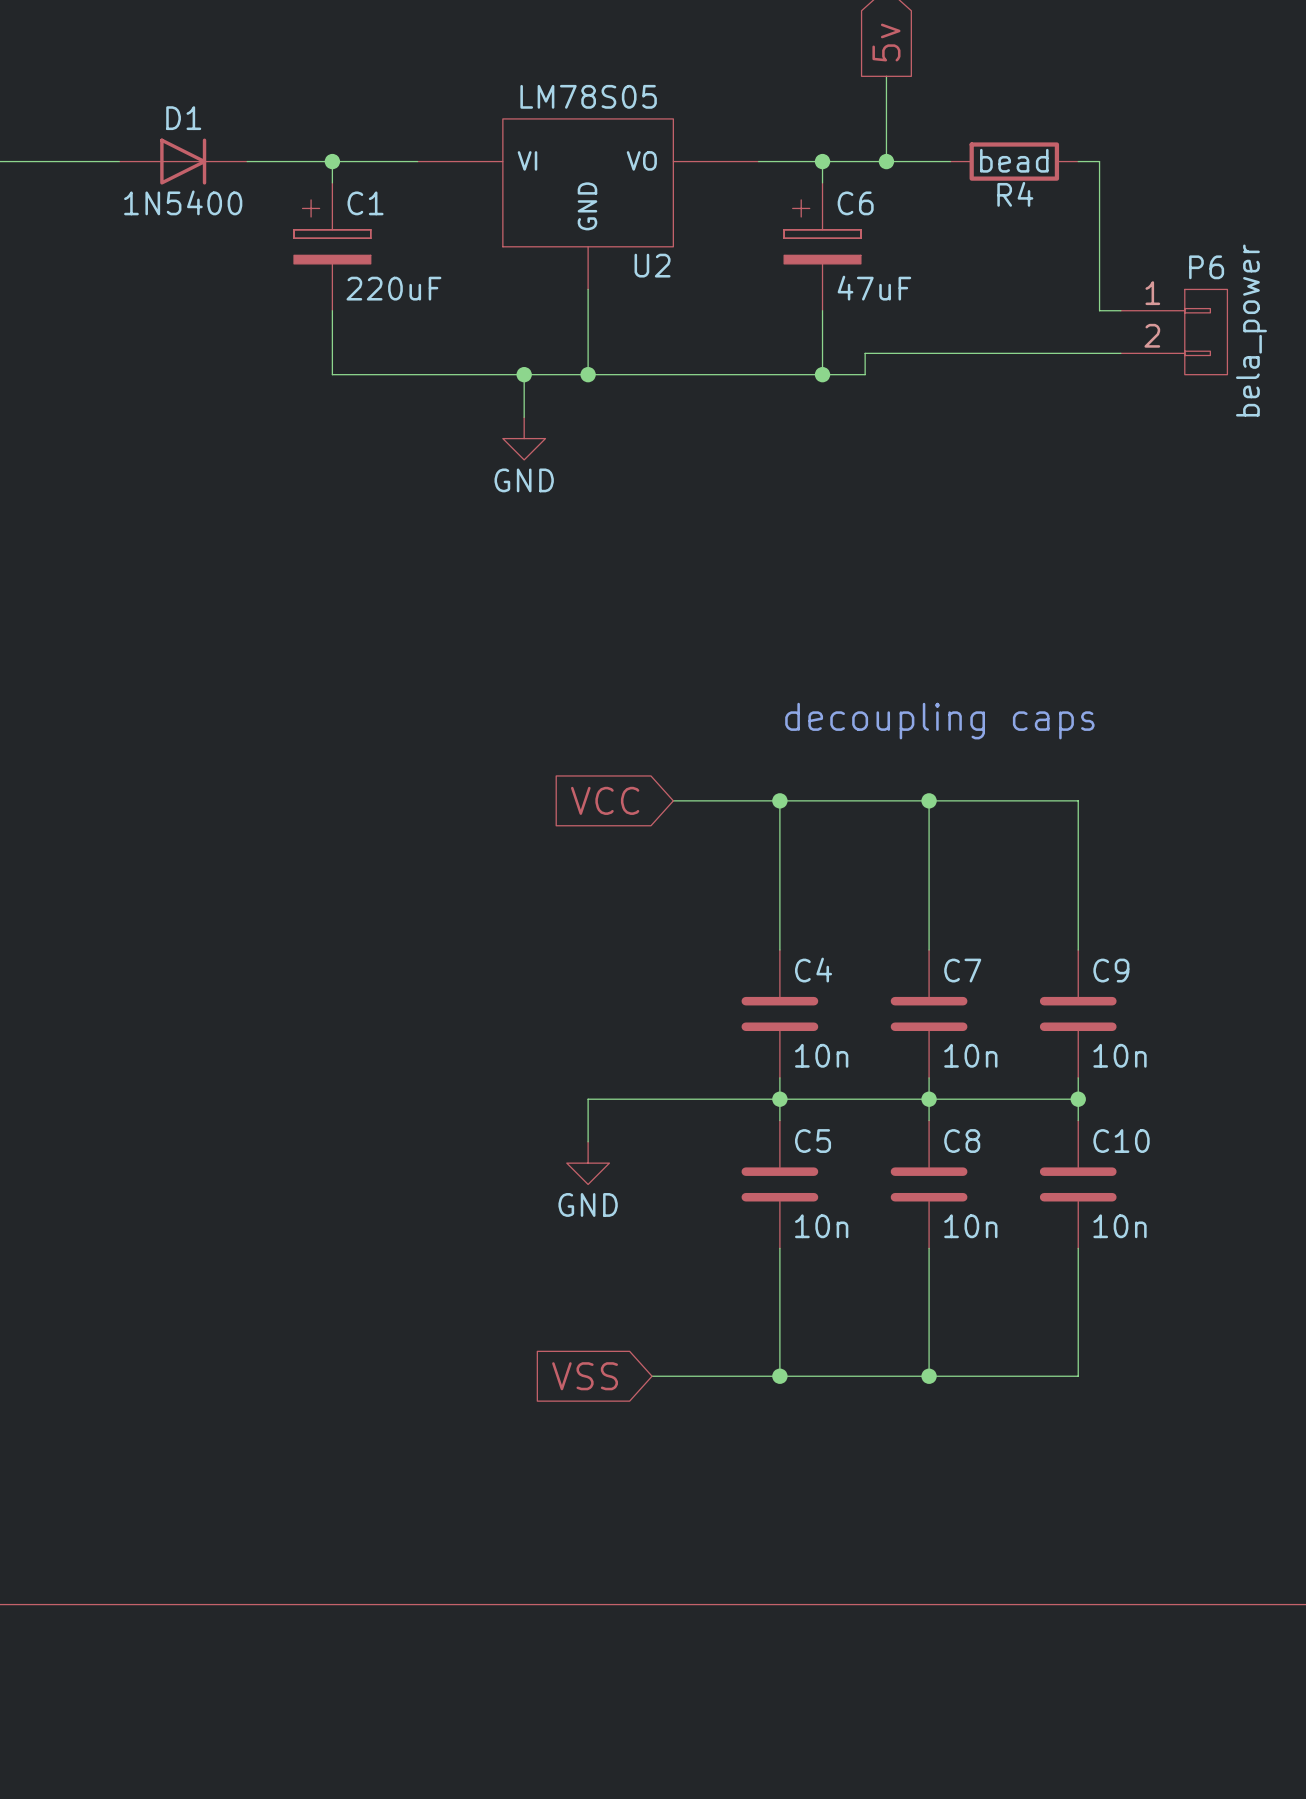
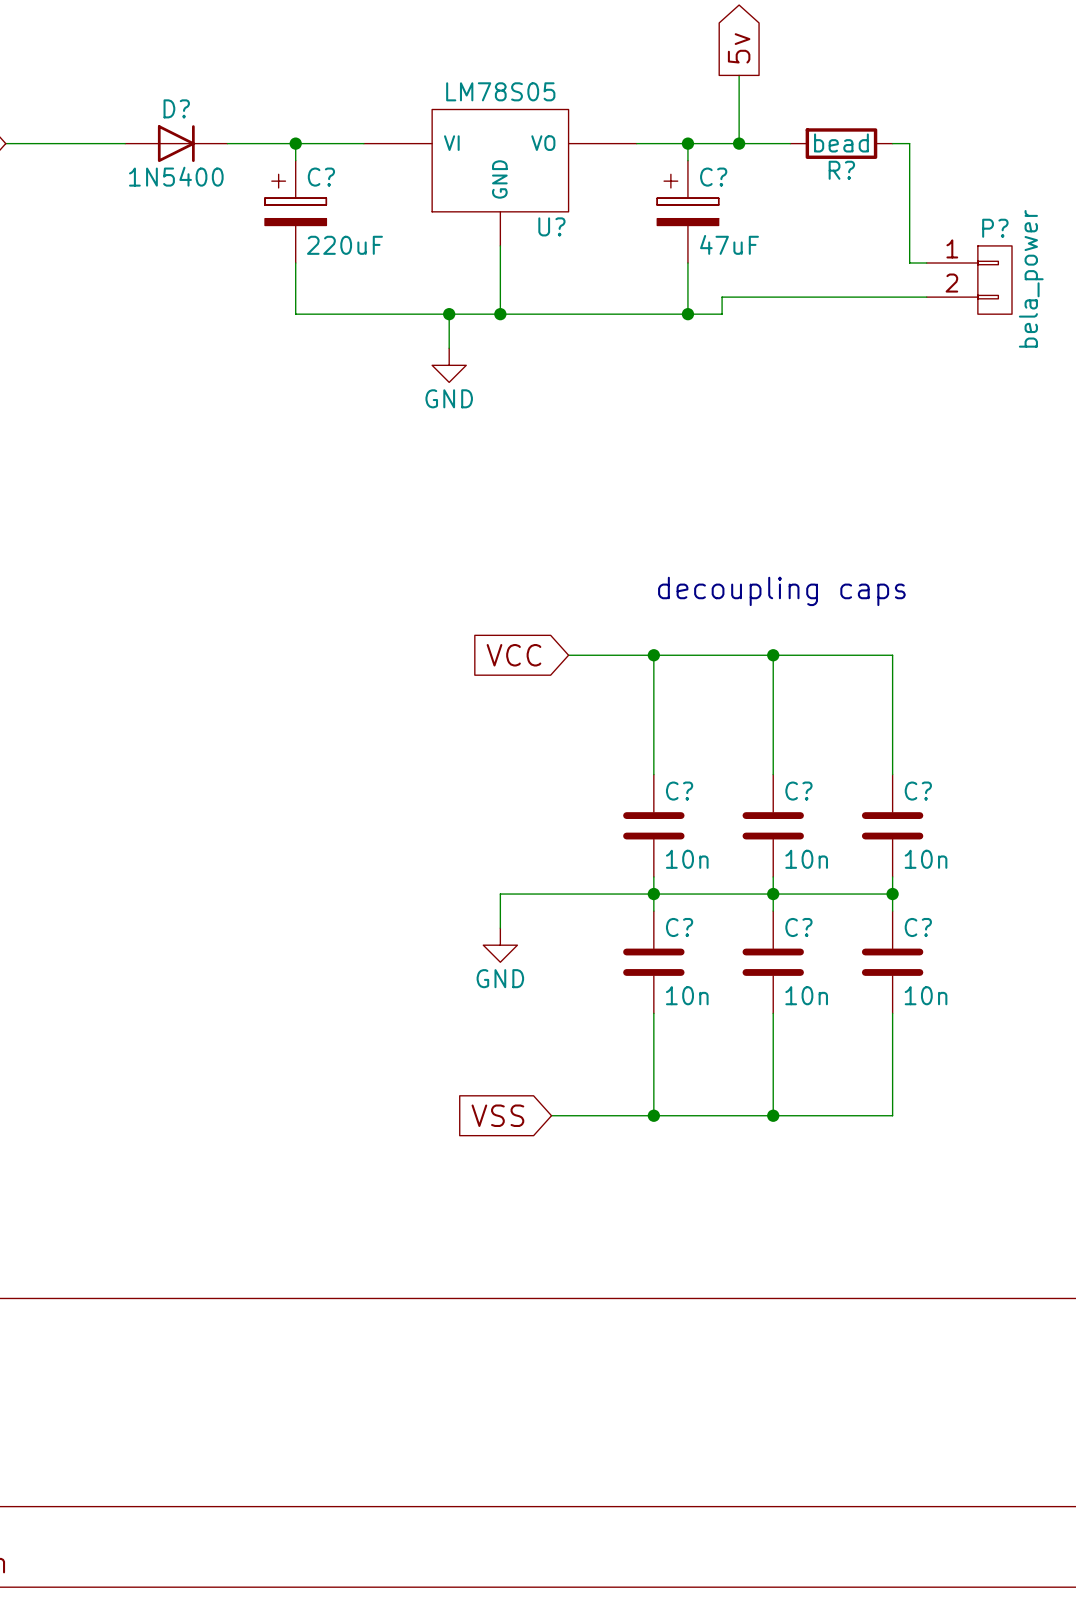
D1 name: D1 (183, 118) -> D? (176, 108)
R4 name: R4 (1015, 194) -> R? (841, 170)
C1 name: C1 (365, 203) -> C? (321, 177)
C6 name: C6 (855, 203) -> C? (713, 177)
U2 name: U2 (652, 265) -> U? (551, 226)
P6 name: P6 (1206, 267) -> P? (995, 228)
C4 name: C4 (813, 970) -> C? (679, 791)
C7 name: C7 (962, 970) -> C? (798, 791)
C9 name: C9 (1111, 970) -> C? (918, 791)
C5 name: C5 (813, 1141) -> C? (679, 927)
C8 name: C8 (962, 1141) -> C? (798, 927)
C10 name: C10 (1121, 1141) -> C? (918, 927)

